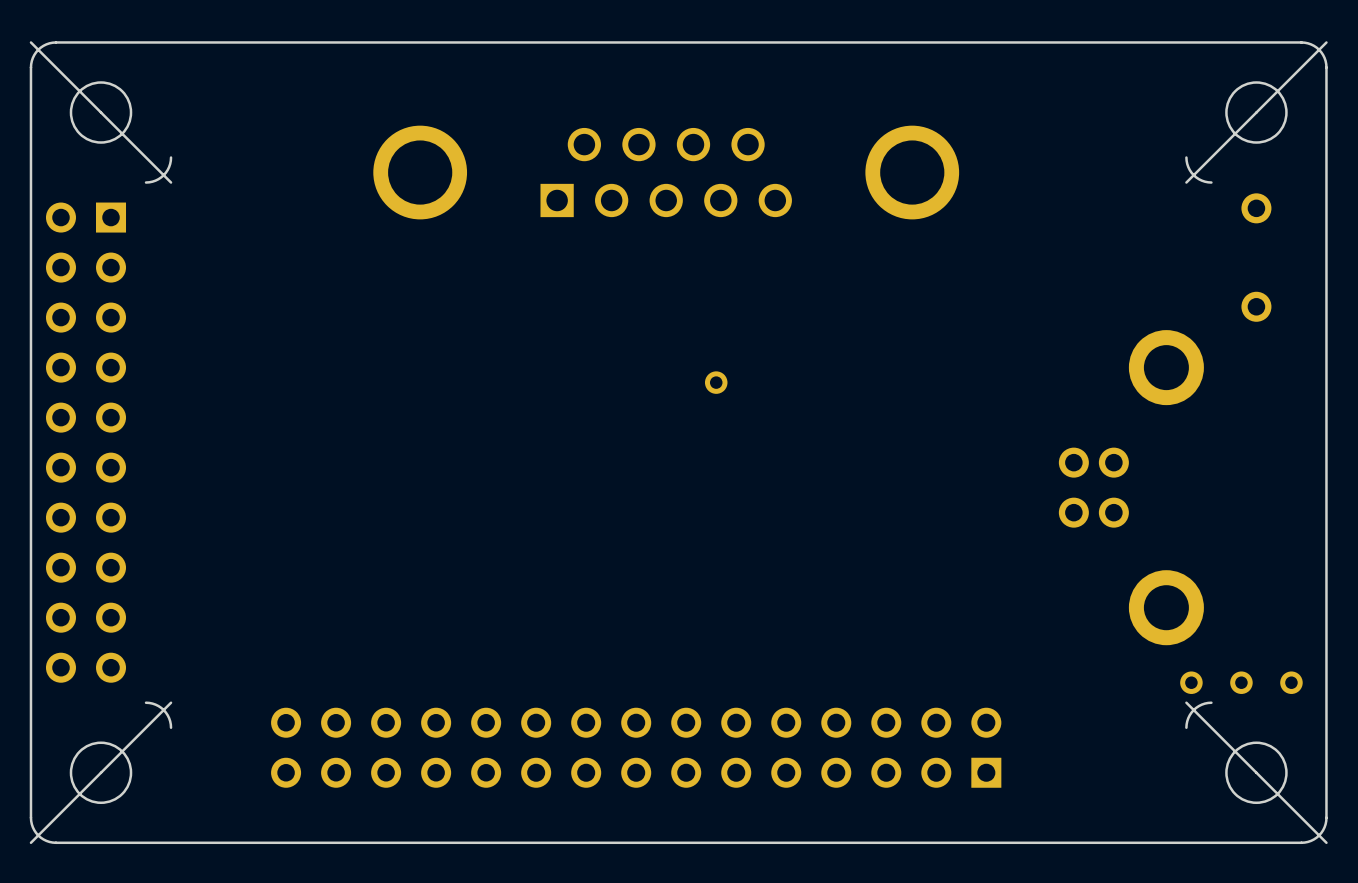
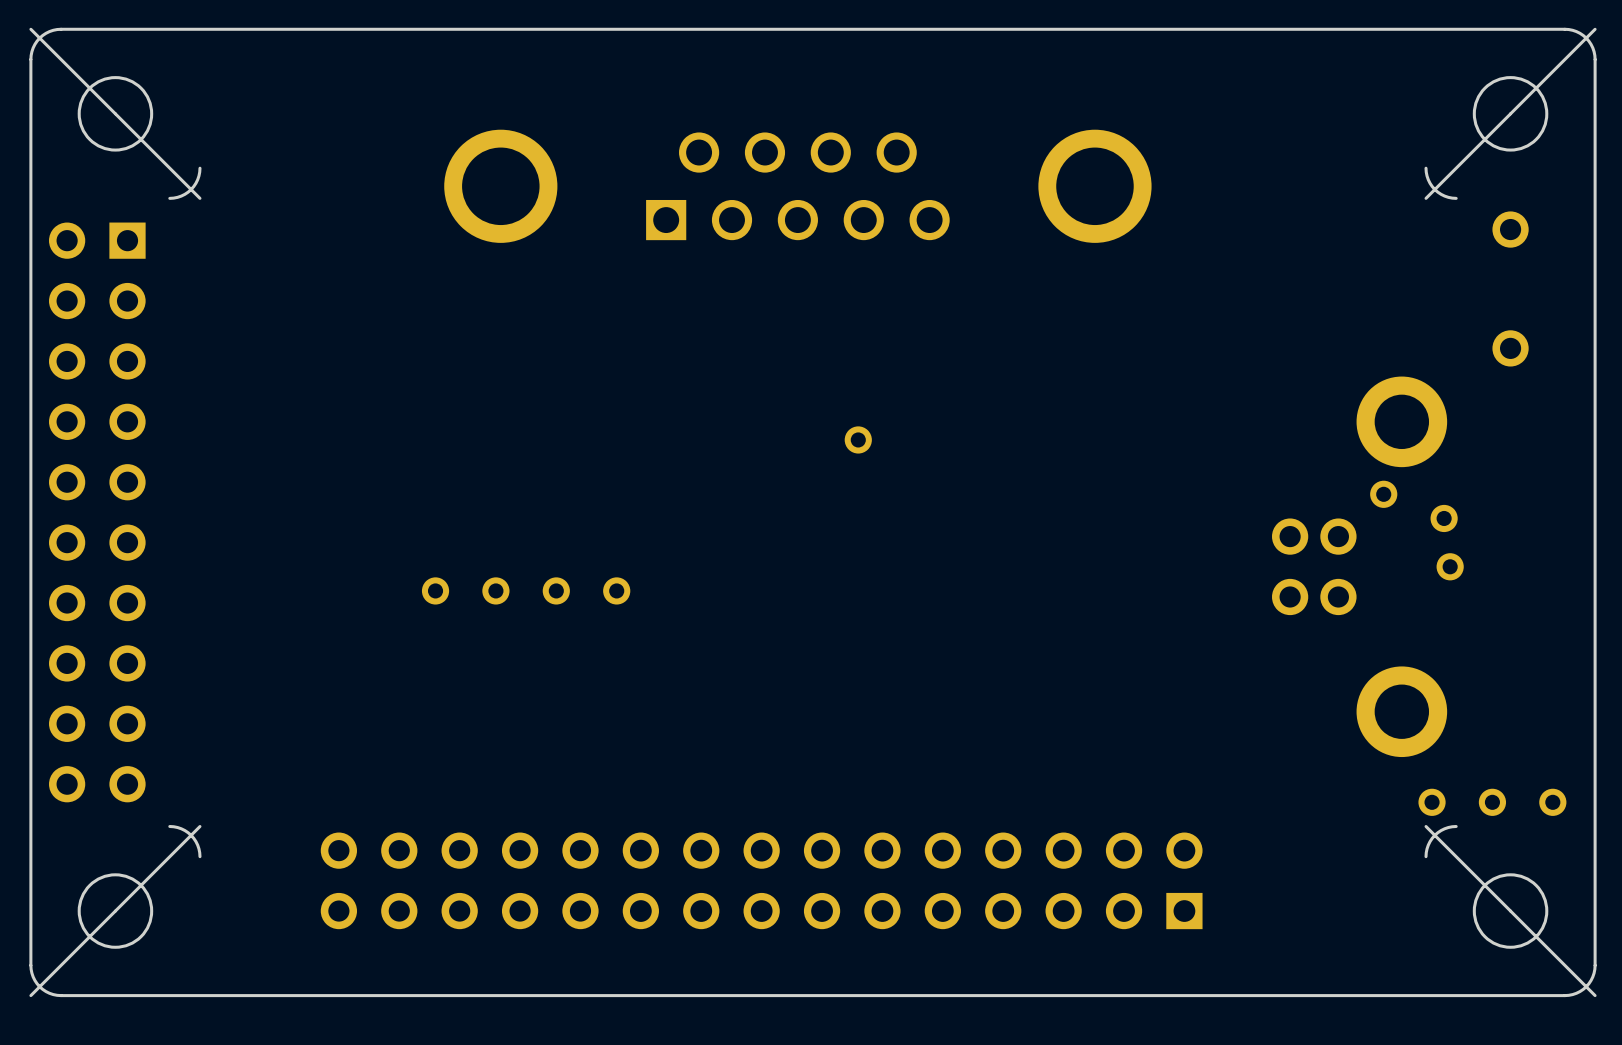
part: none -> (1383, 494)
part: none -> (1444, 518)
part: none -> (1450, 566)
part: none -> (435, 590)
part: none -> (495, 590)
part: none -> (556, 590)
part: none -> (616, 590)

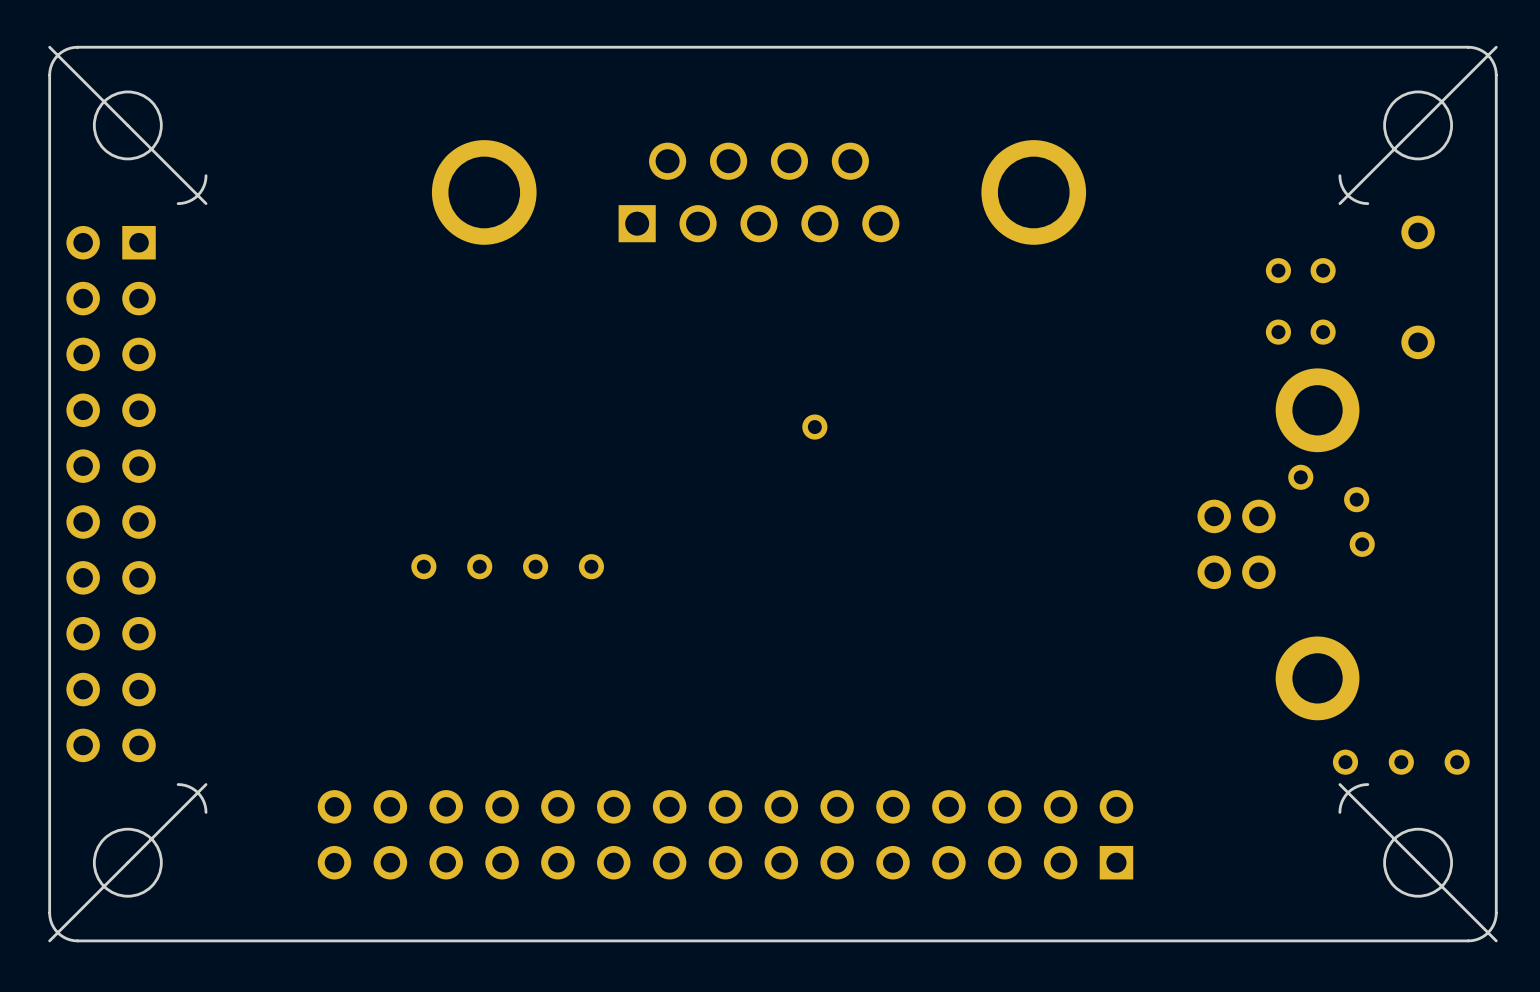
part: none -> (1278, 270)
part: none -> (1323, 270)
part: none -> (1278, 332)
part: none -> (1323, 332)

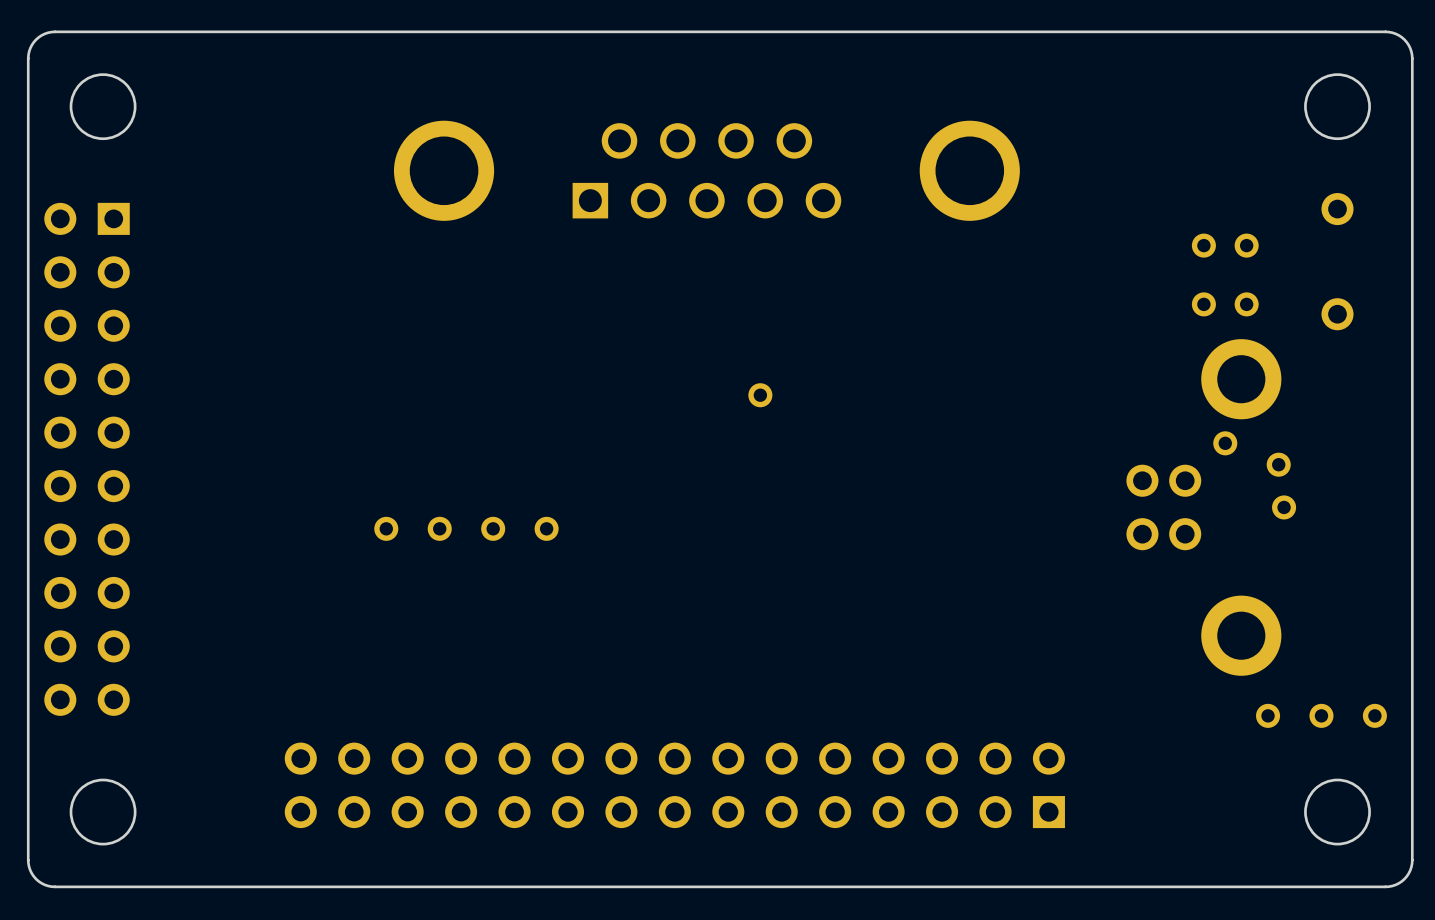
board edge: (49, 47) (206, 203) -> none
board edge: (1496, 47) (1339, 203) -> none
board edge: (206, 175) (203, 186) (197, 195) (188, 201) (178, 203) -> none
board edge: (1339, 175) (1342, 186) (1348, 195) (1357, 201) (1367, 203) -> none
board edge: (178, 784) (188, 786) (197, 792) (203, 801) (206, 812) -> none
board edge: (206, 784) (49, 940) -> none
board edge: (1339, 784) (1496, 940) -> none
board edge: (1367, 784) (1357, 786) (1348, 792) (1342, 801) (1339, 812) -> none

